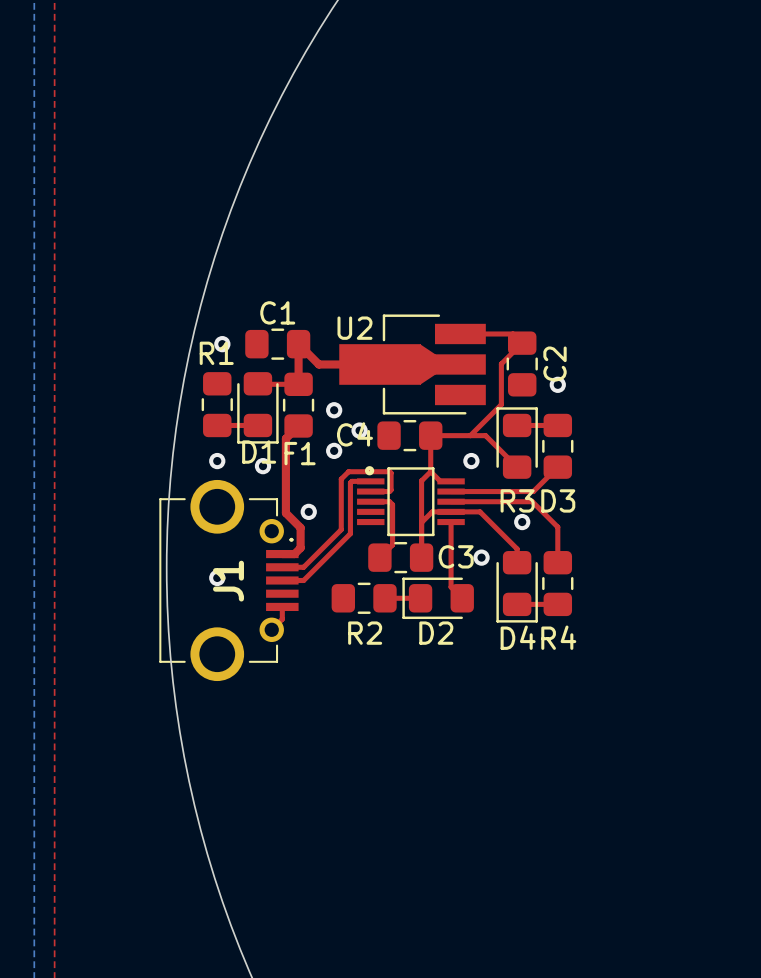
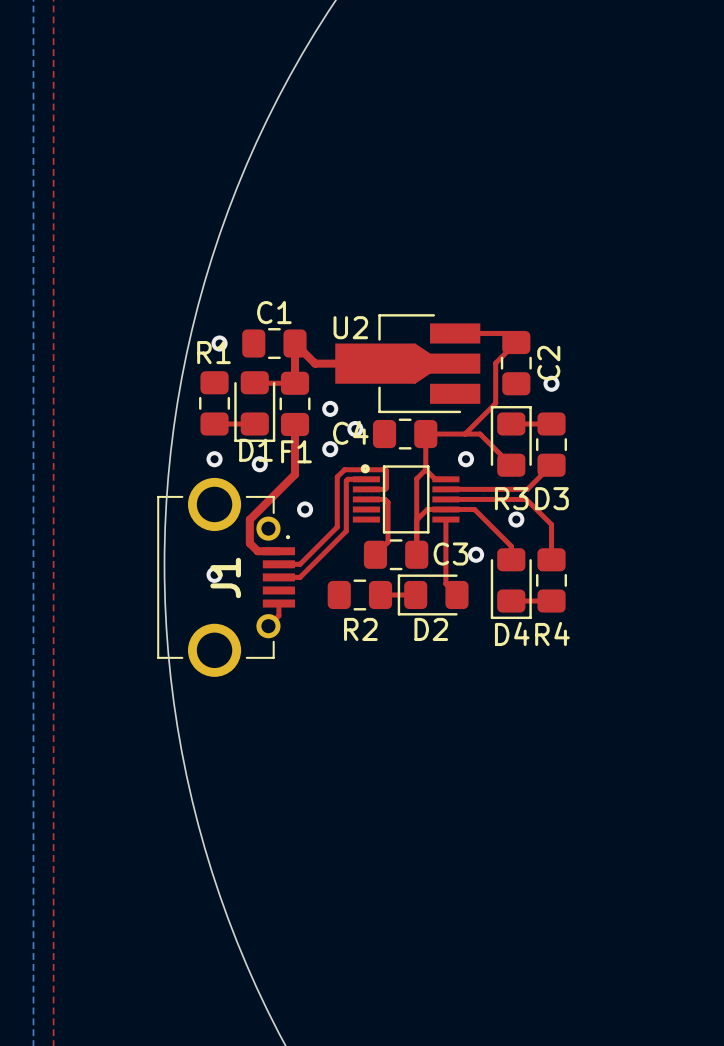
top track: (298, 425) (285, 438) (285, 513) (300, 527) (300, 547) (294, 554) (282, 554) -> (295, 424) (295, 474) (249, 519) (249, 543) (257, 551) (278, 551)

